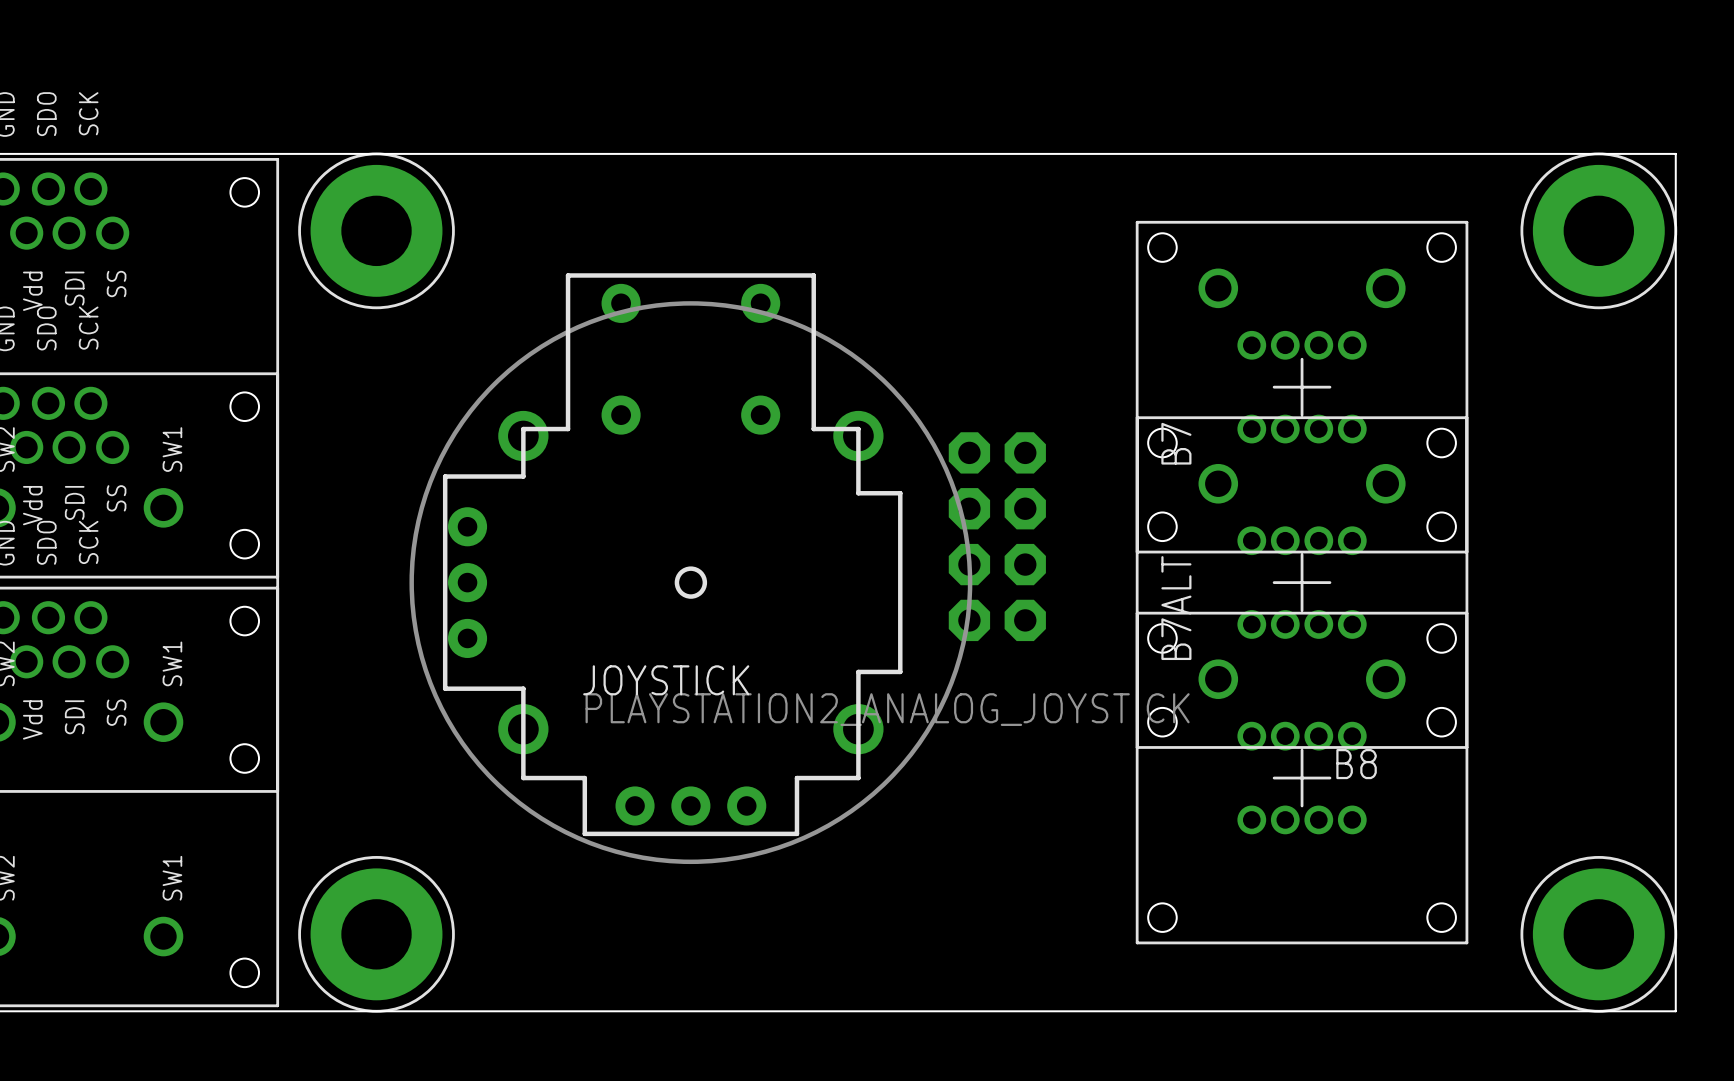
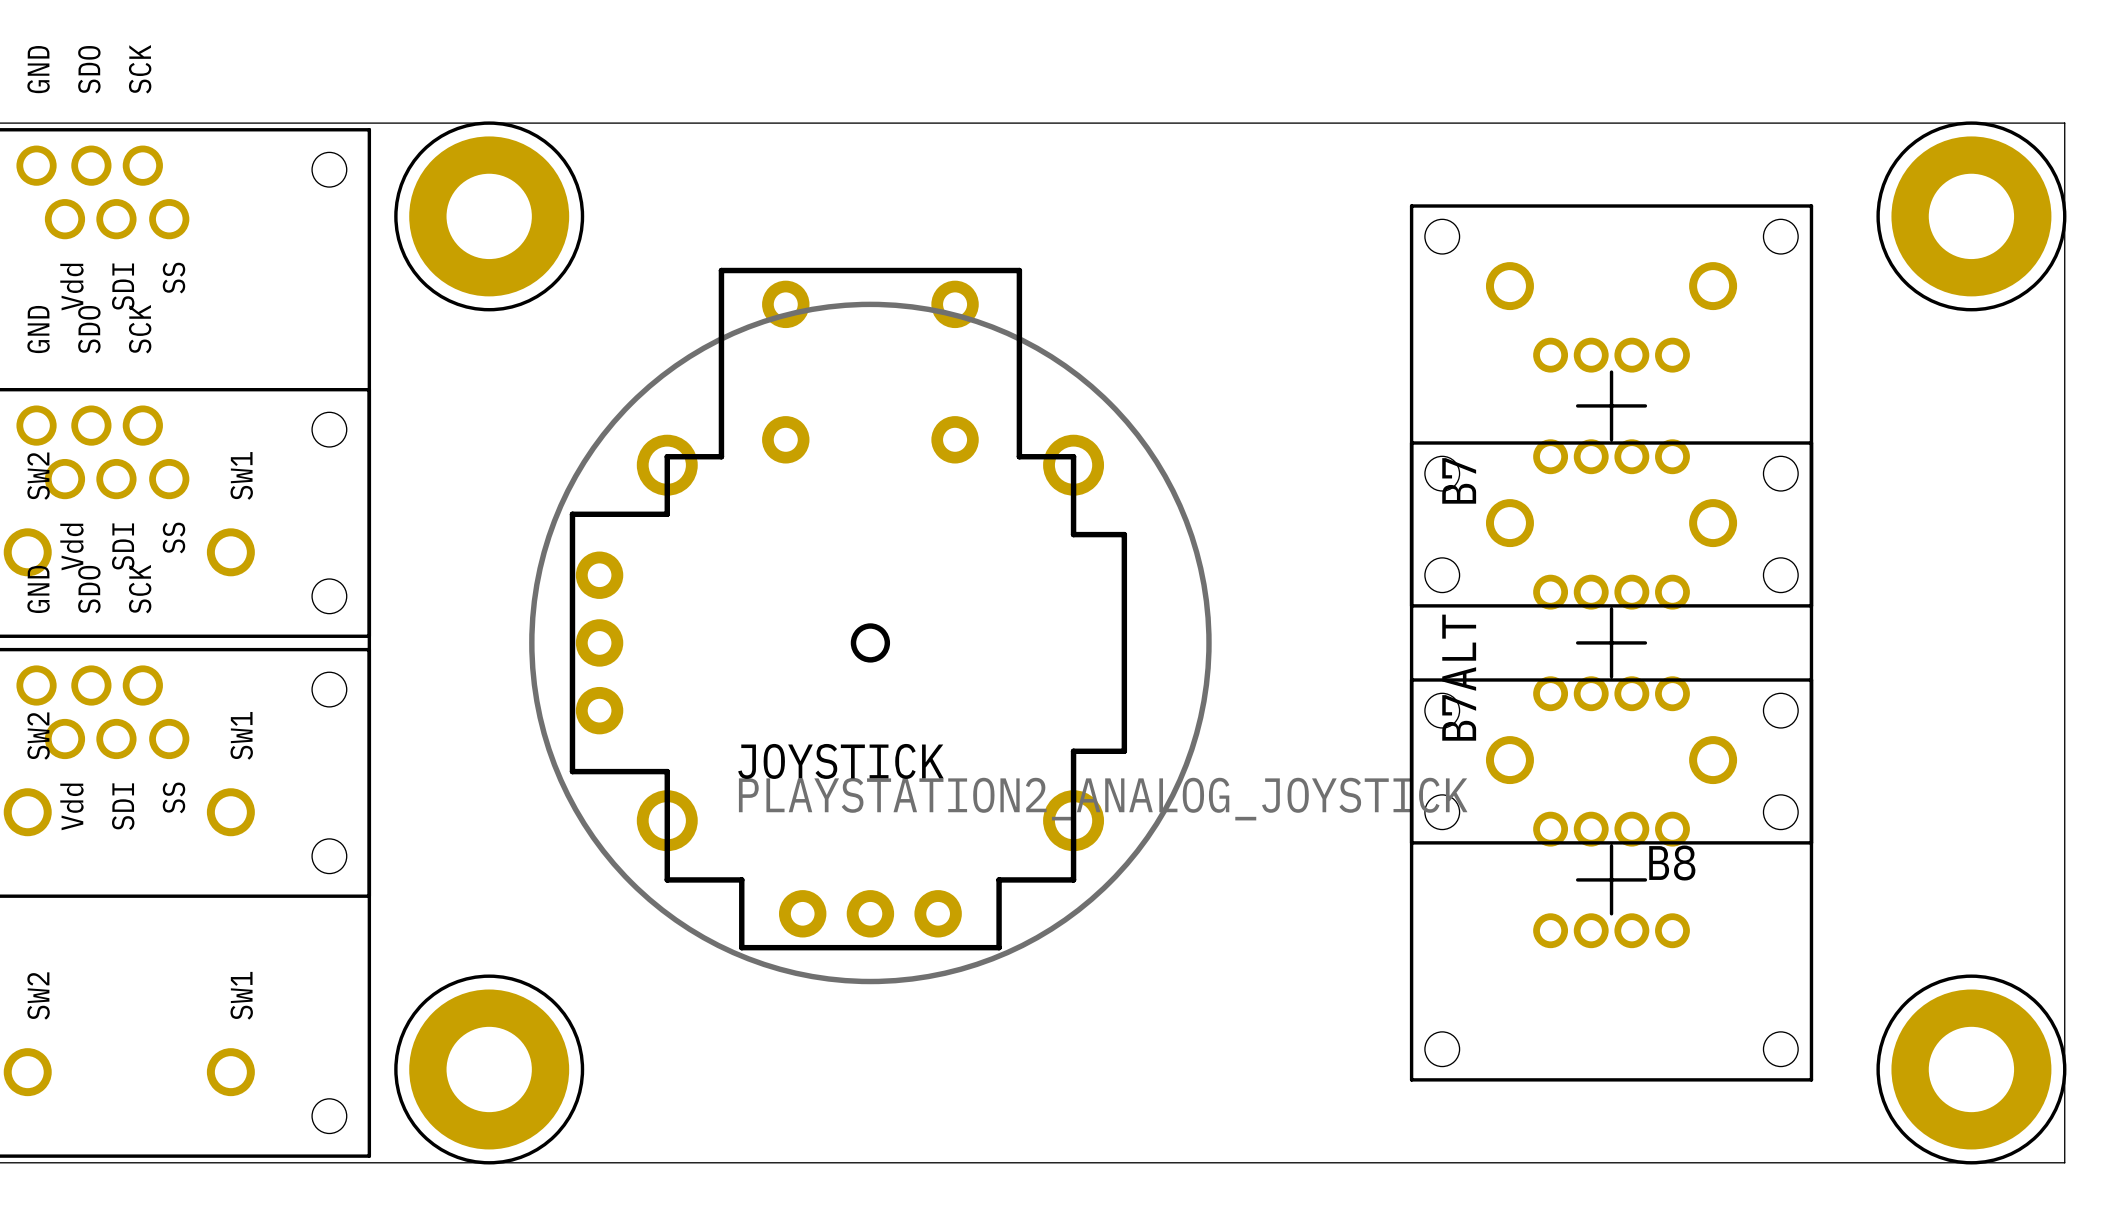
part: (997, 536) -> none

